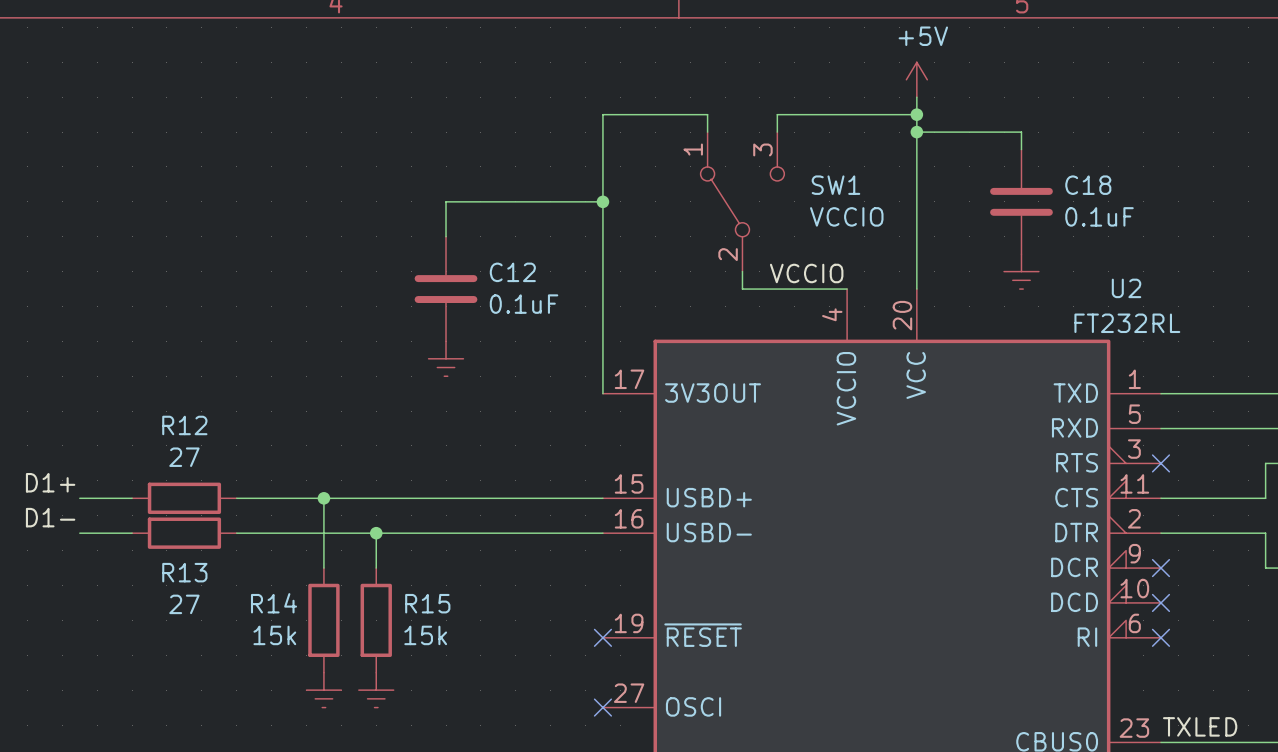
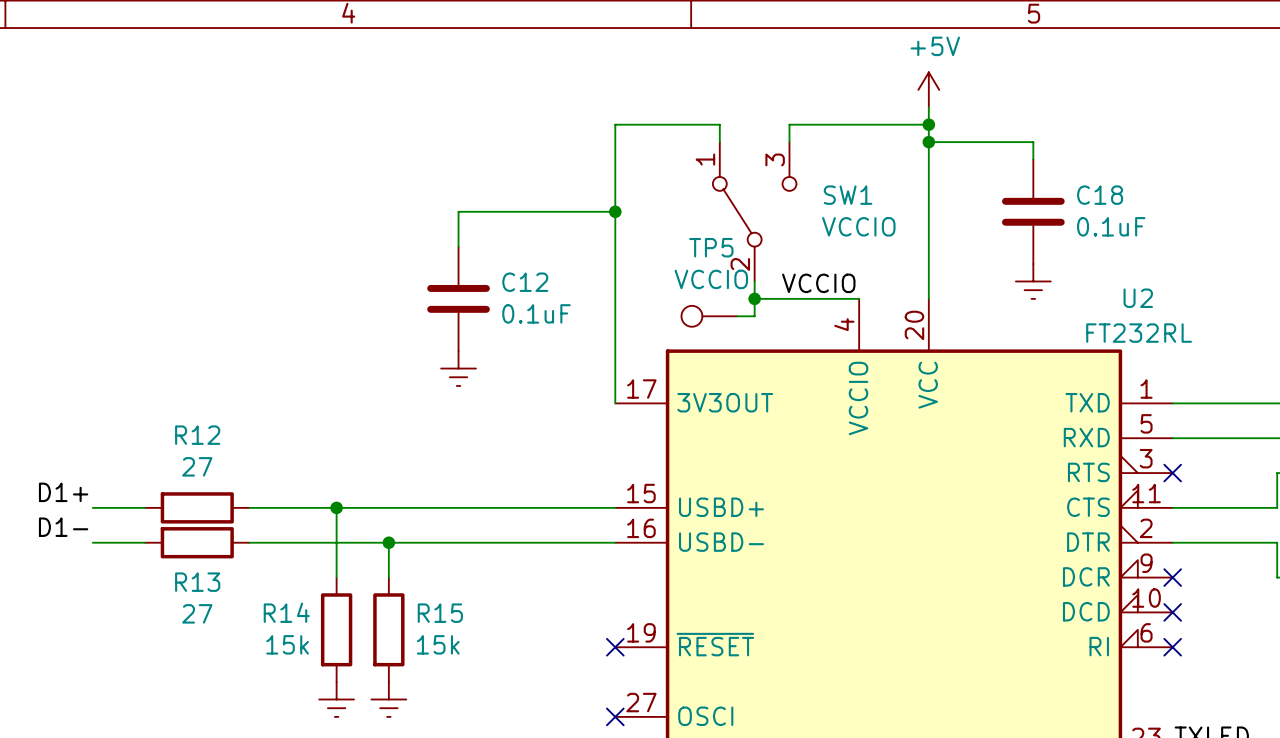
wire: none -> (754, 298) (754, 316) (737, 316)
junction: none -> (754, 298)
TP5: none -> VCCIO (709, 316)

